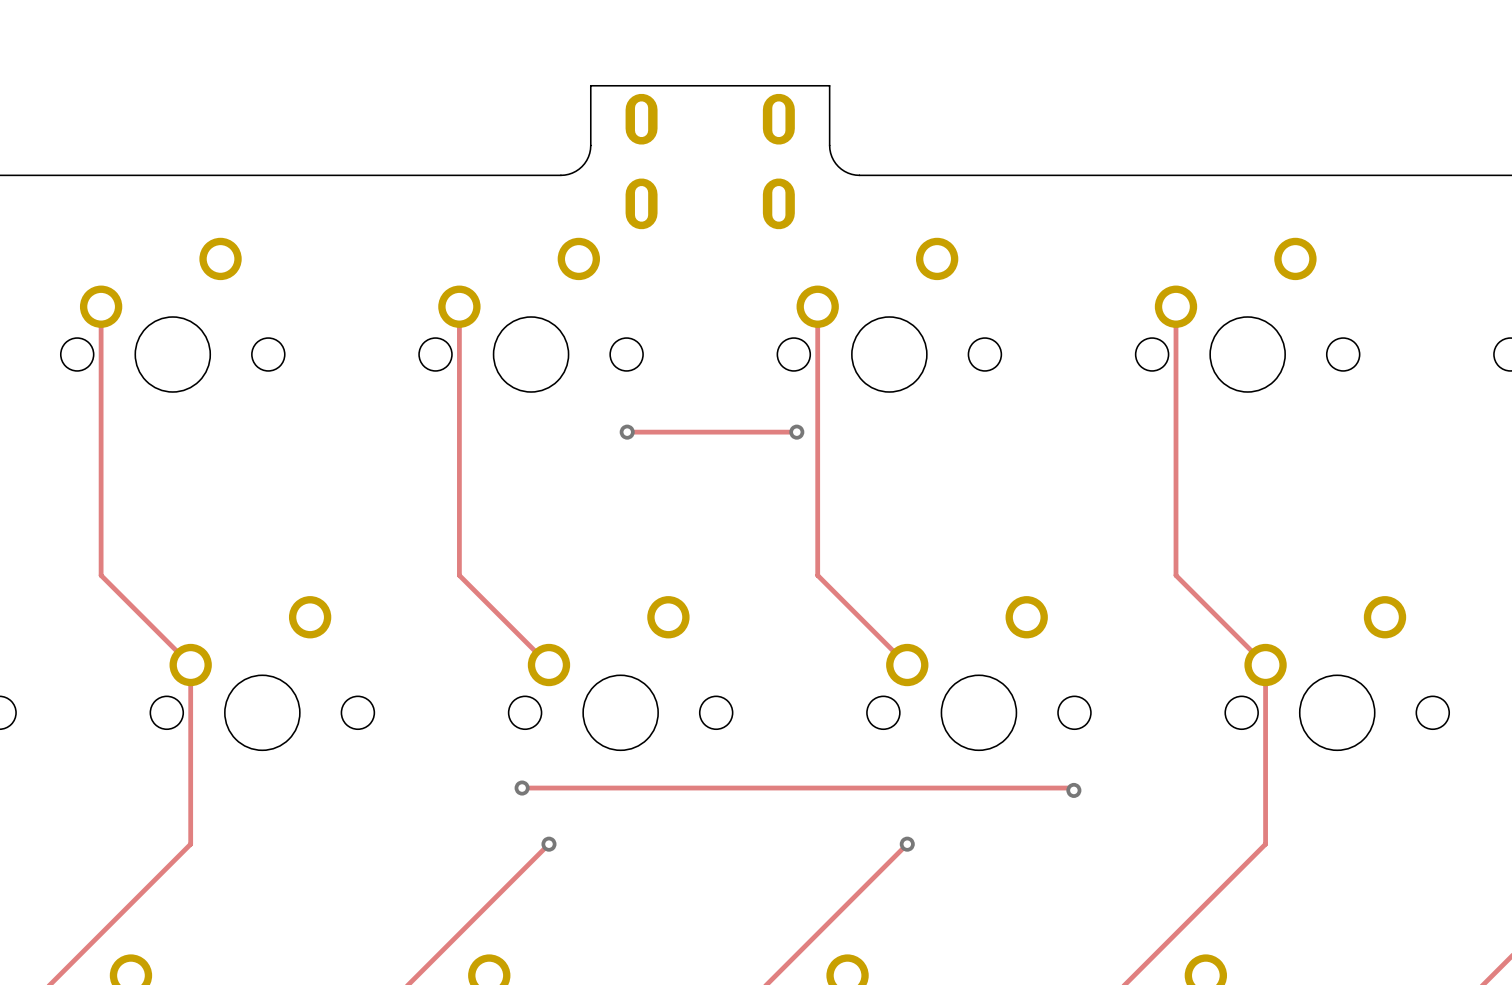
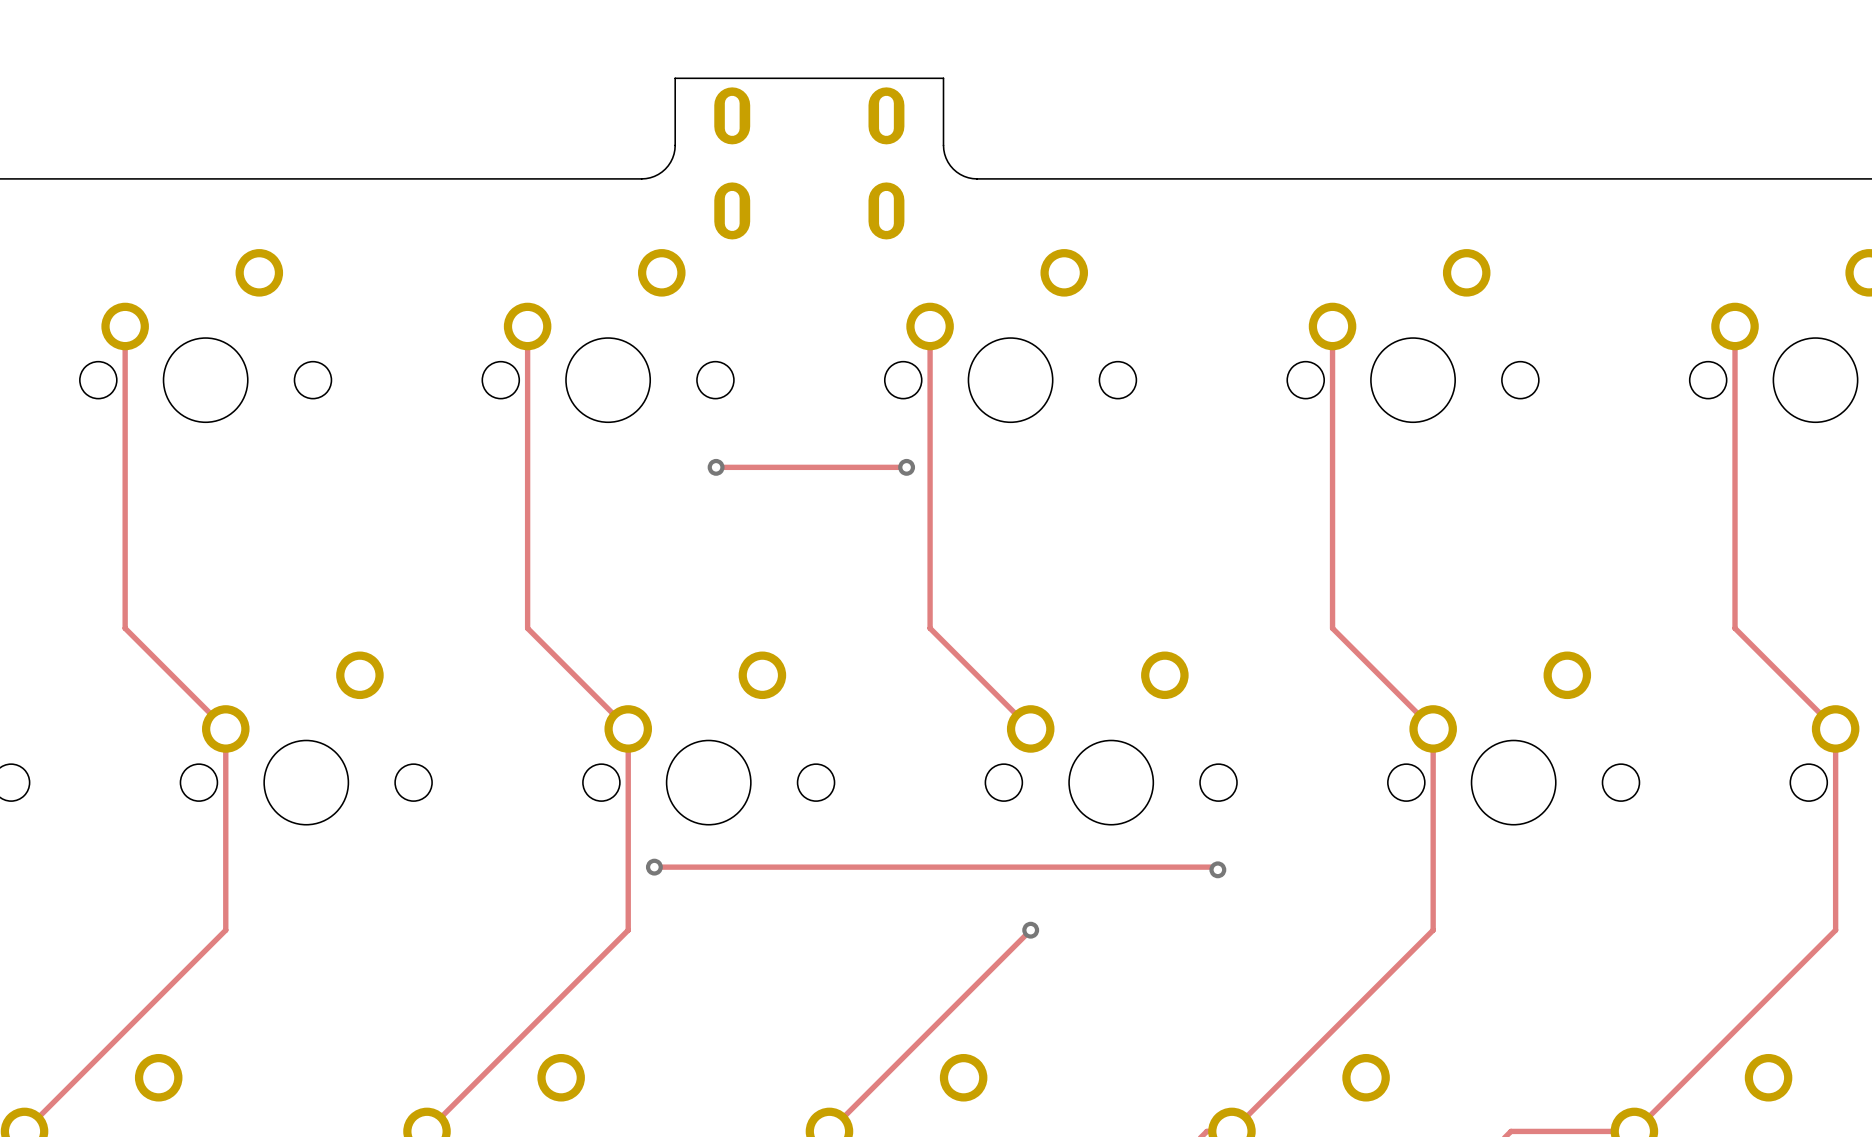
track: none -> (628, 728) (628, 930)
track: (522, 788) (572, 788) -> none
via: (522, 788) -> none
via: none -> (654, 867)
via: (548, 844) -> none

